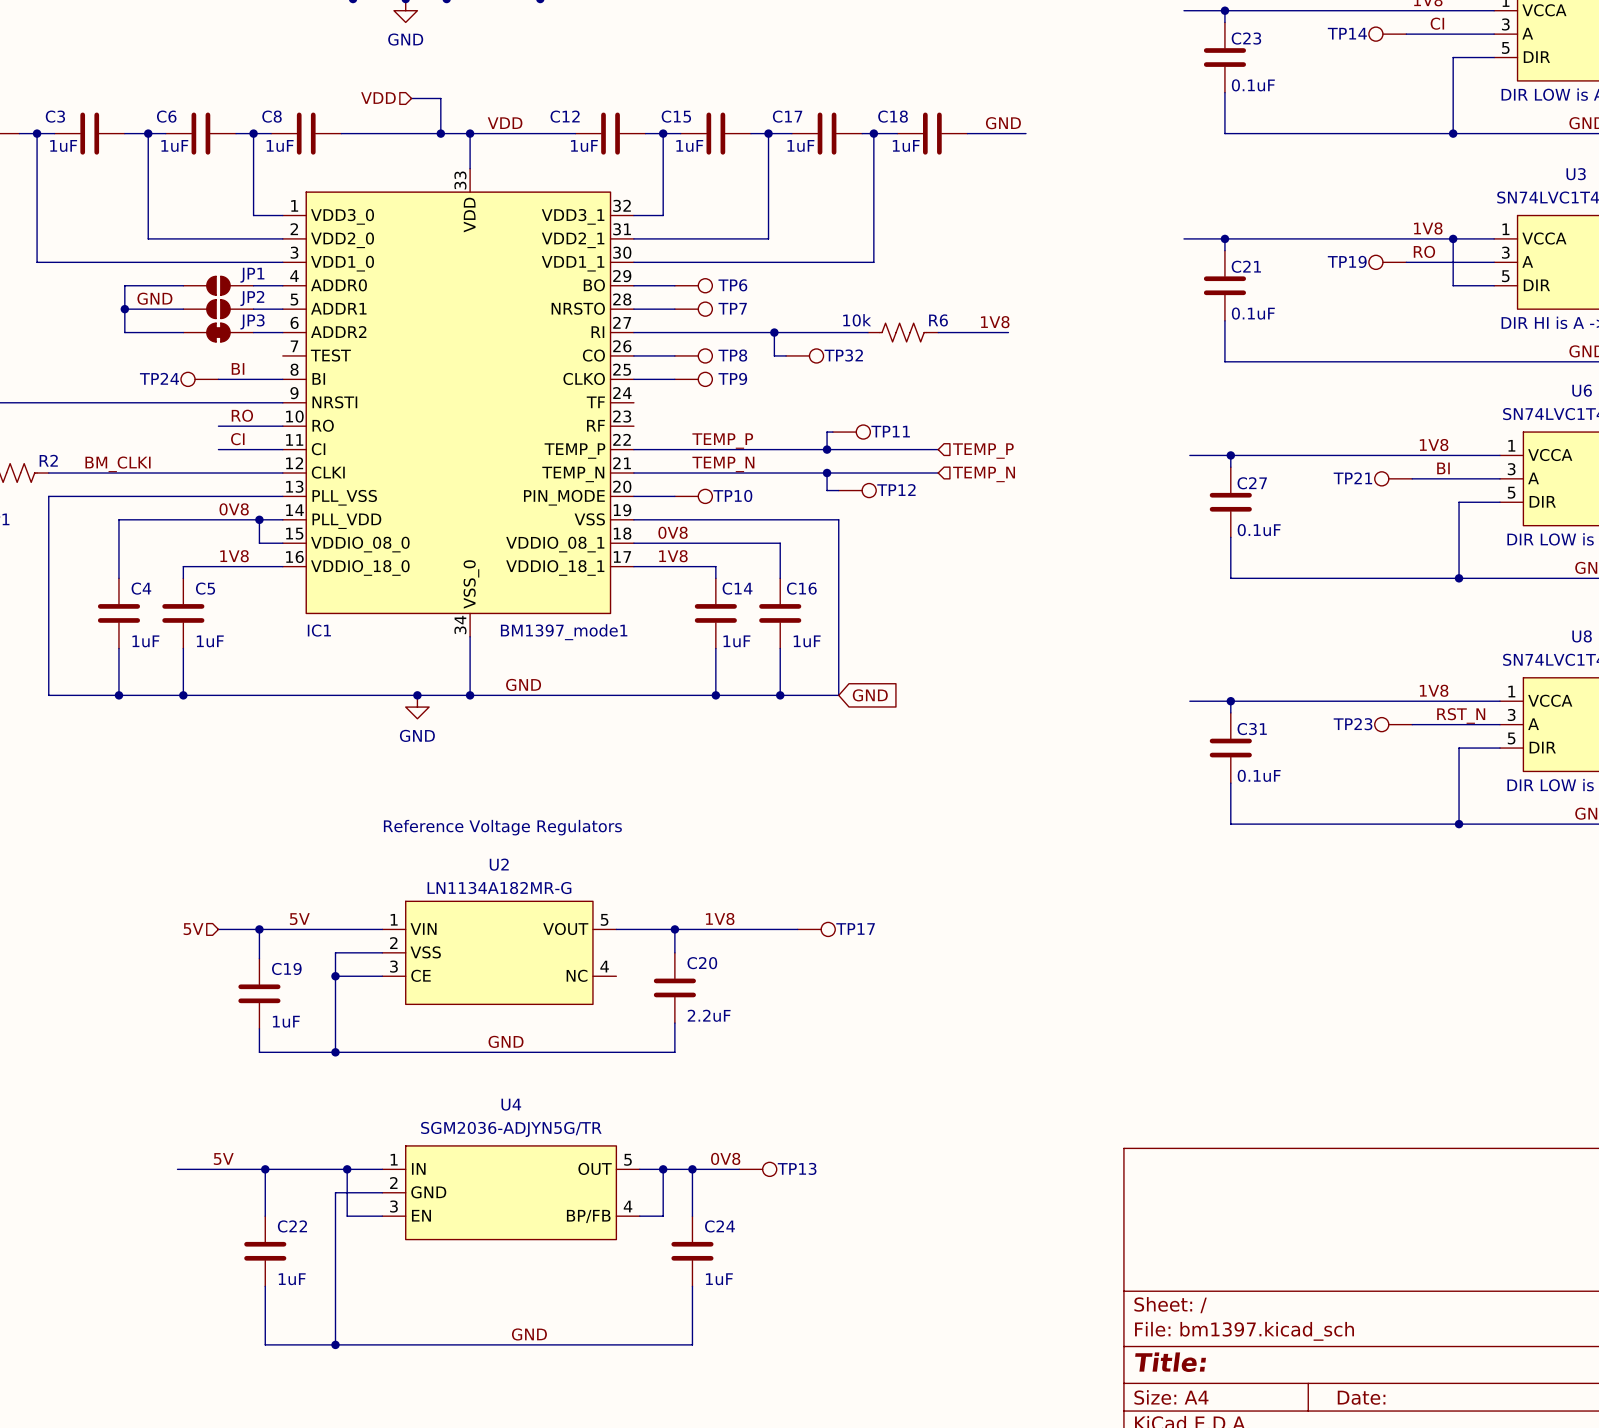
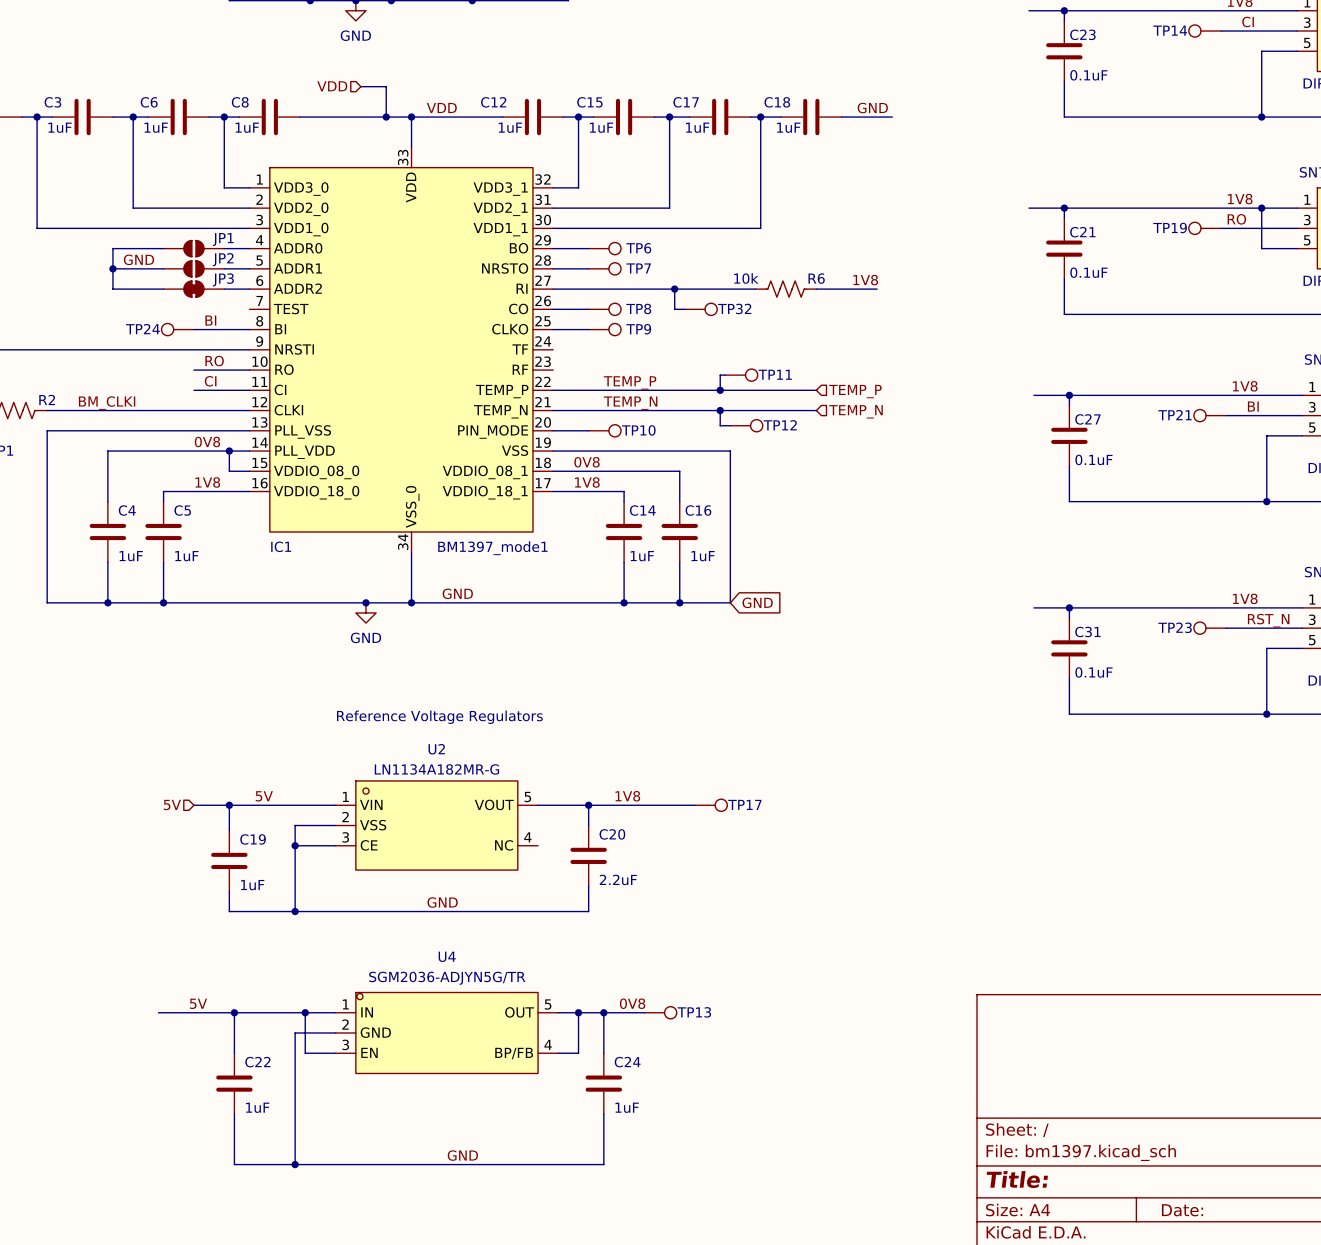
U2 symbol: [382, 901, 617, 1005] -> [335, 780, 539, 871]
U4 symbol: [382, 1145, 640, 1240] -> [335, 992, 559, 1074]

